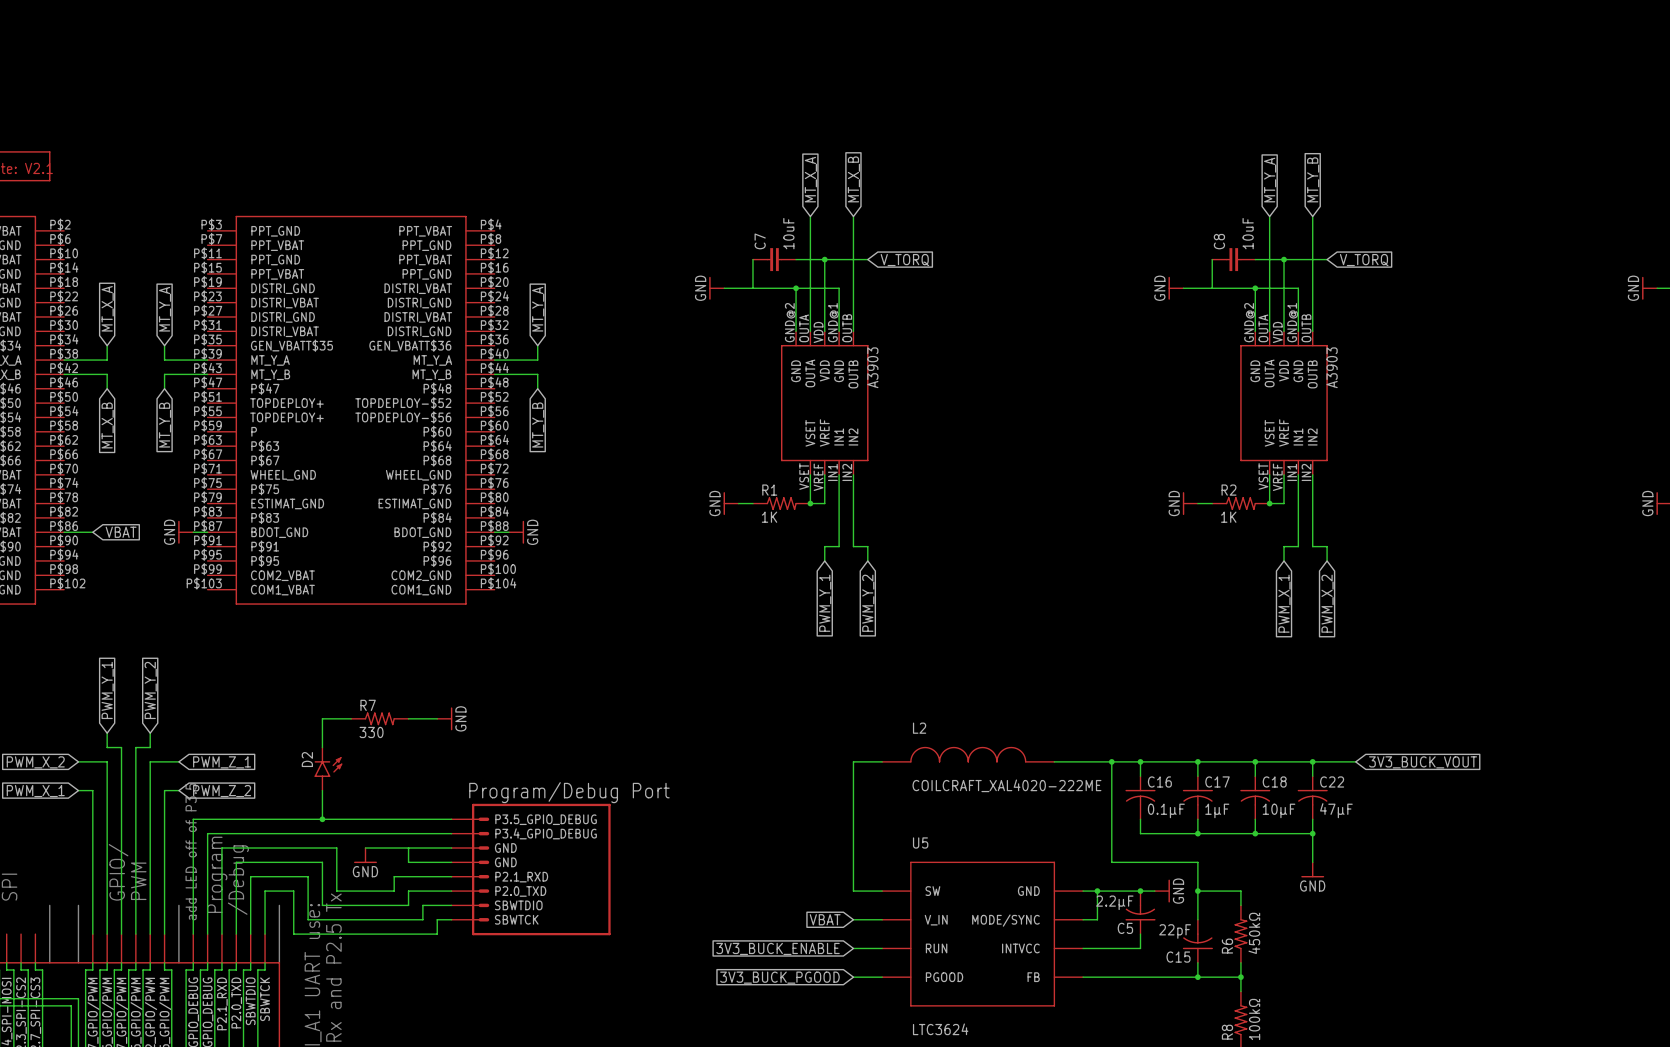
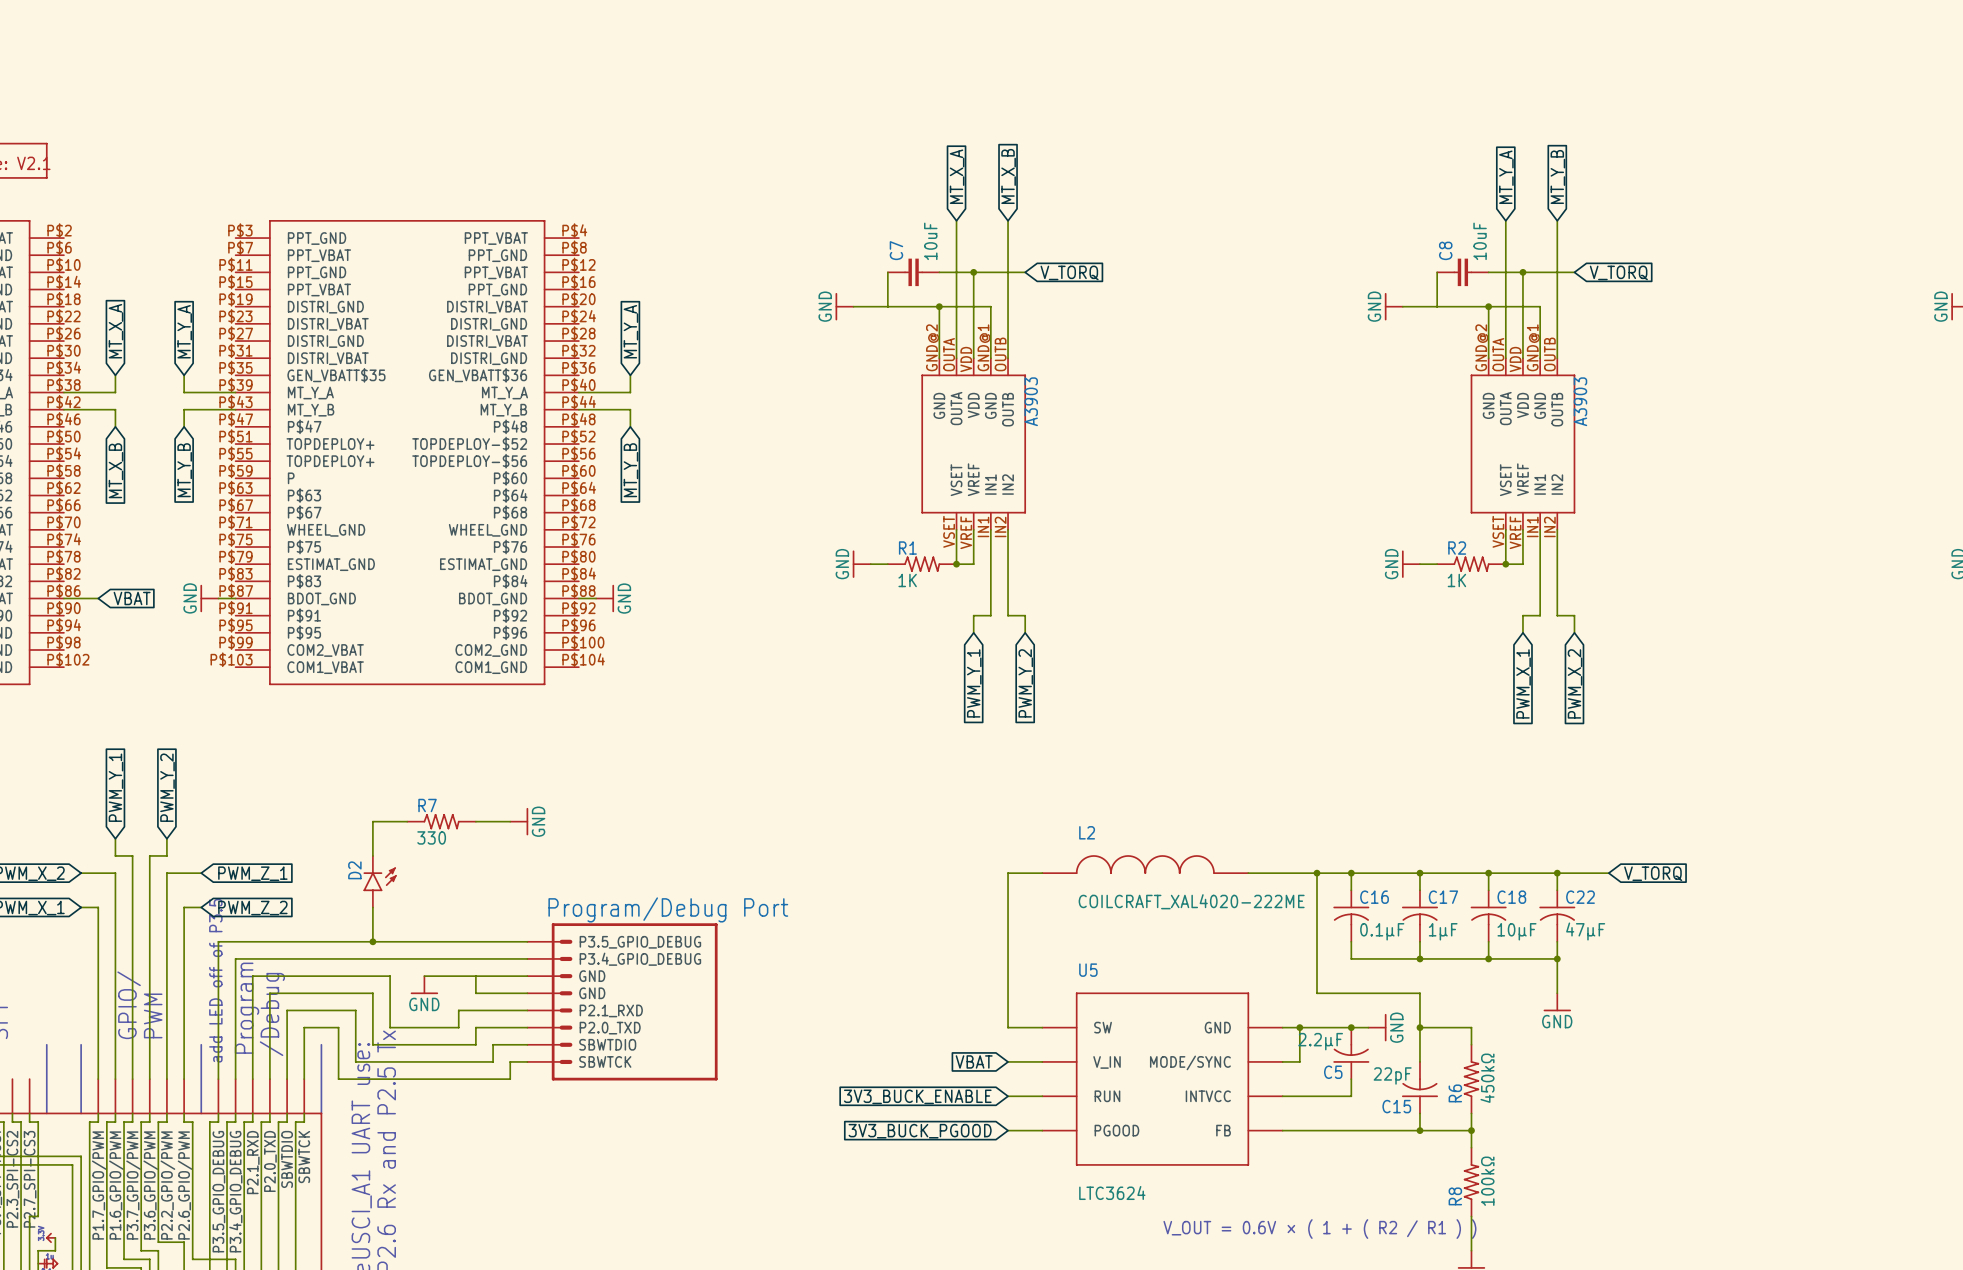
global label: 3V3_BUCK_VOUT (1423, 762) -> V_TORQ (1653, 873)

